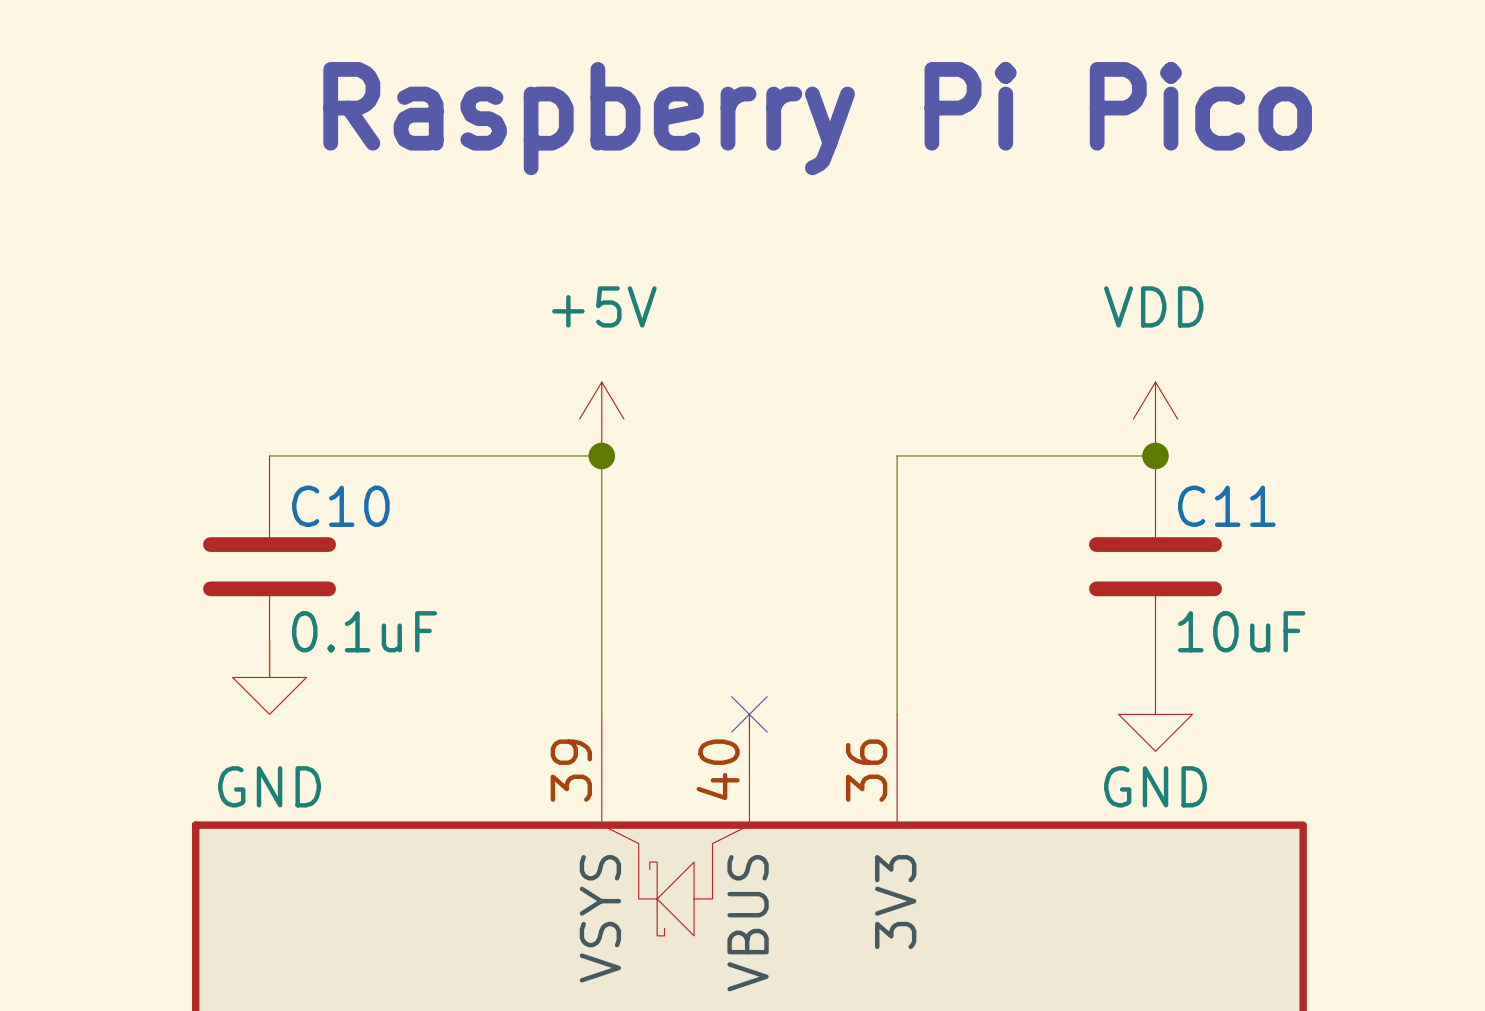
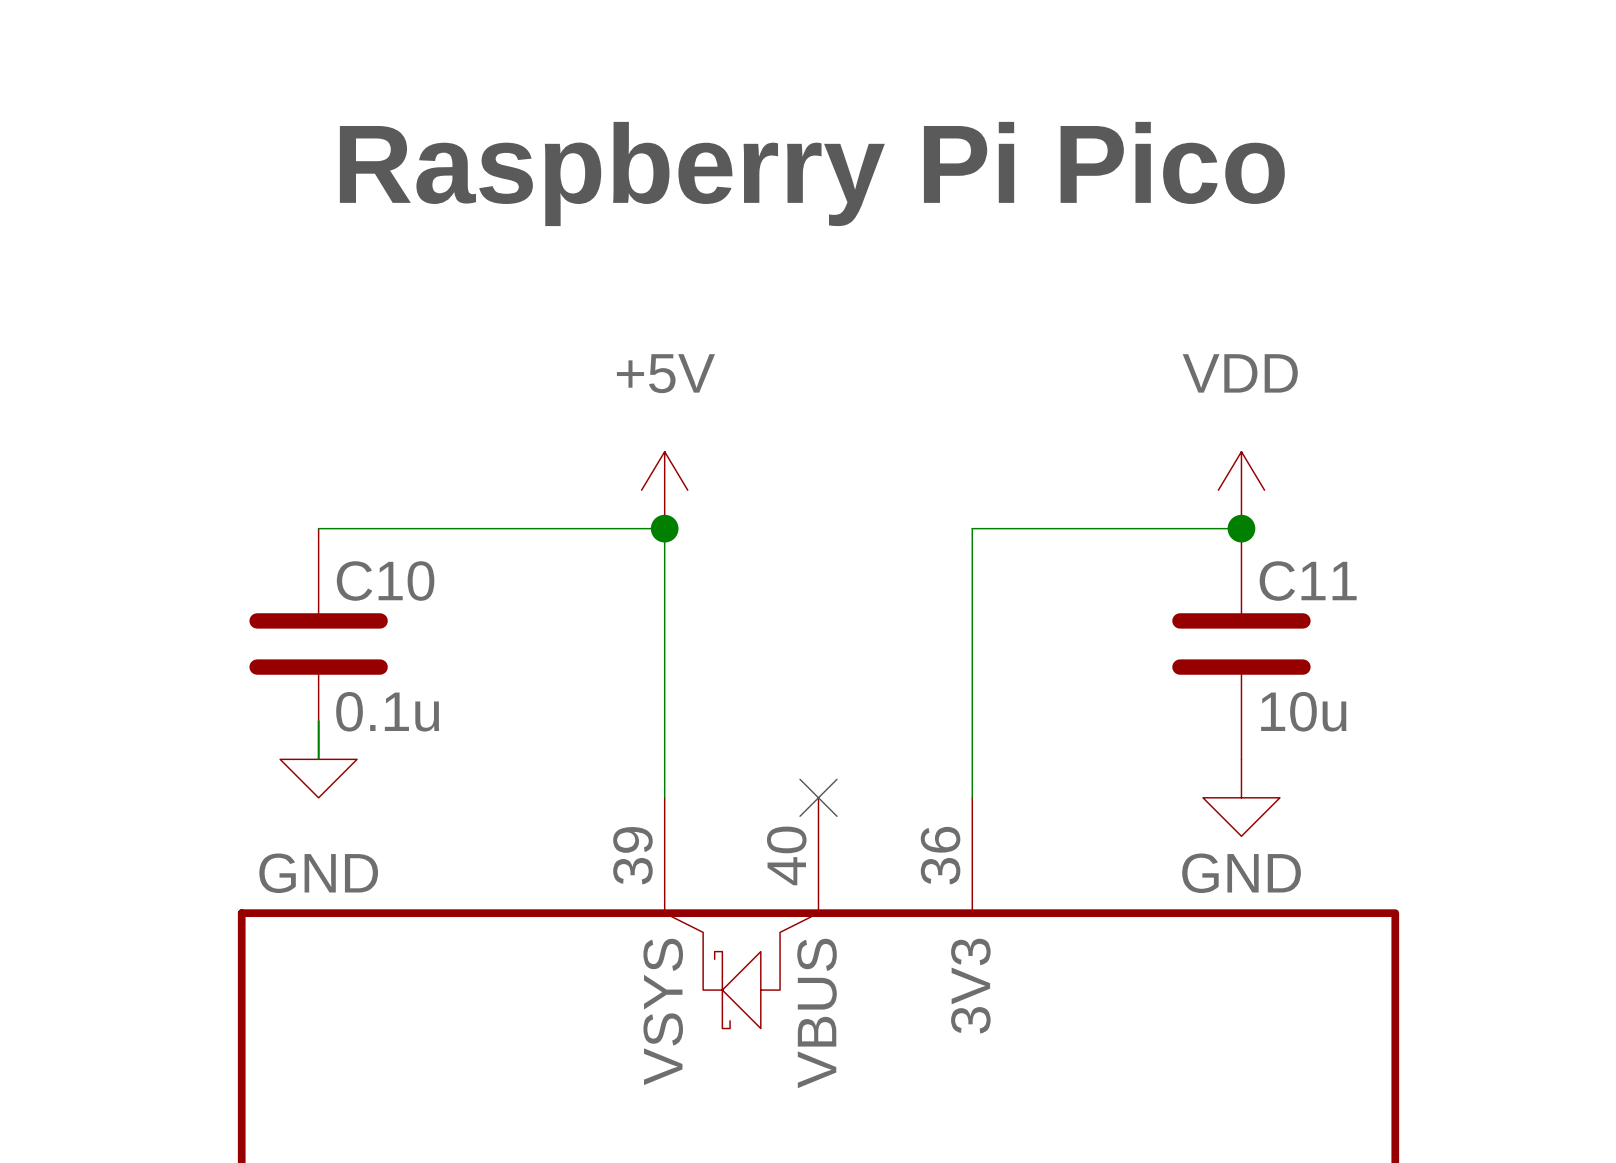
text position: Raspberry Pi Pico (817, 118) -> Raspberry Pi Pico (812, 173)
C10 value: 0.1uF (364, 631) -> 0.1u (387, 711)
C11 value: 10uF (1241, 631) -> 10u (1303, 711)

